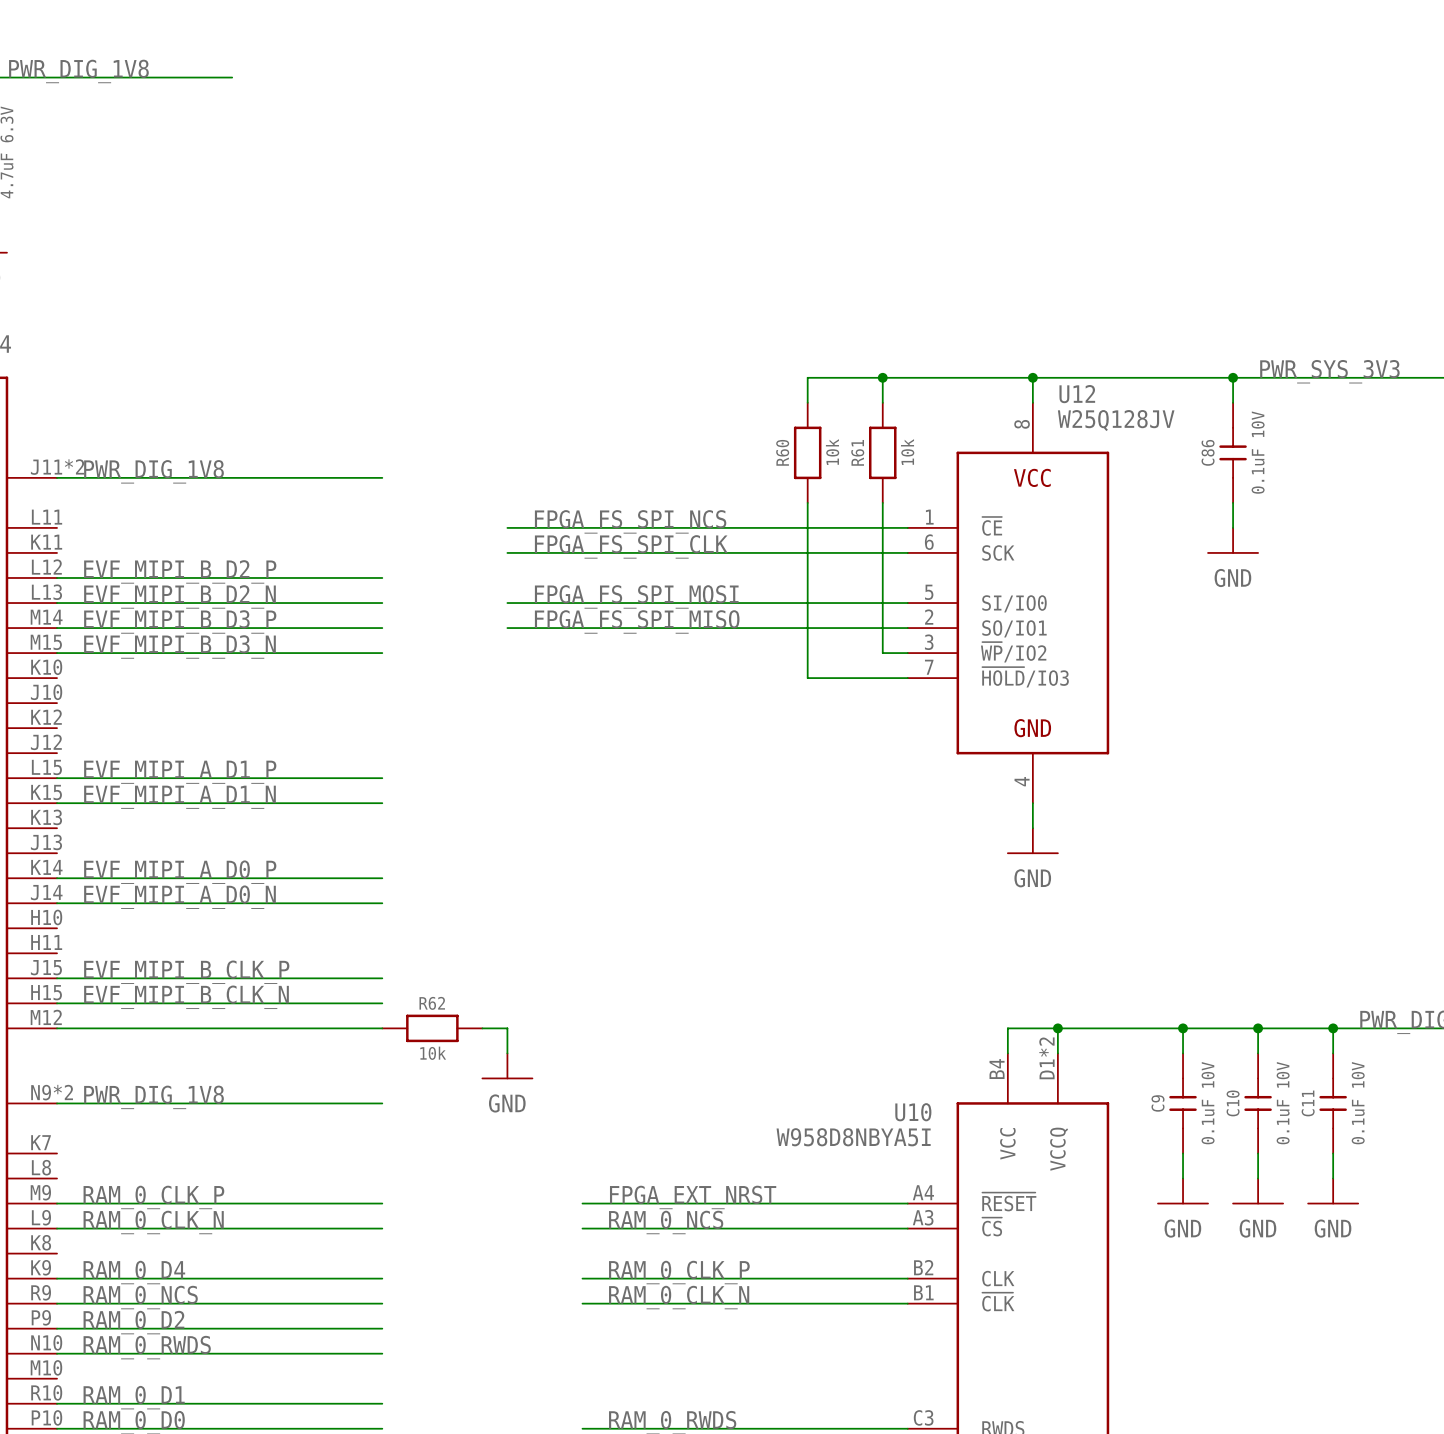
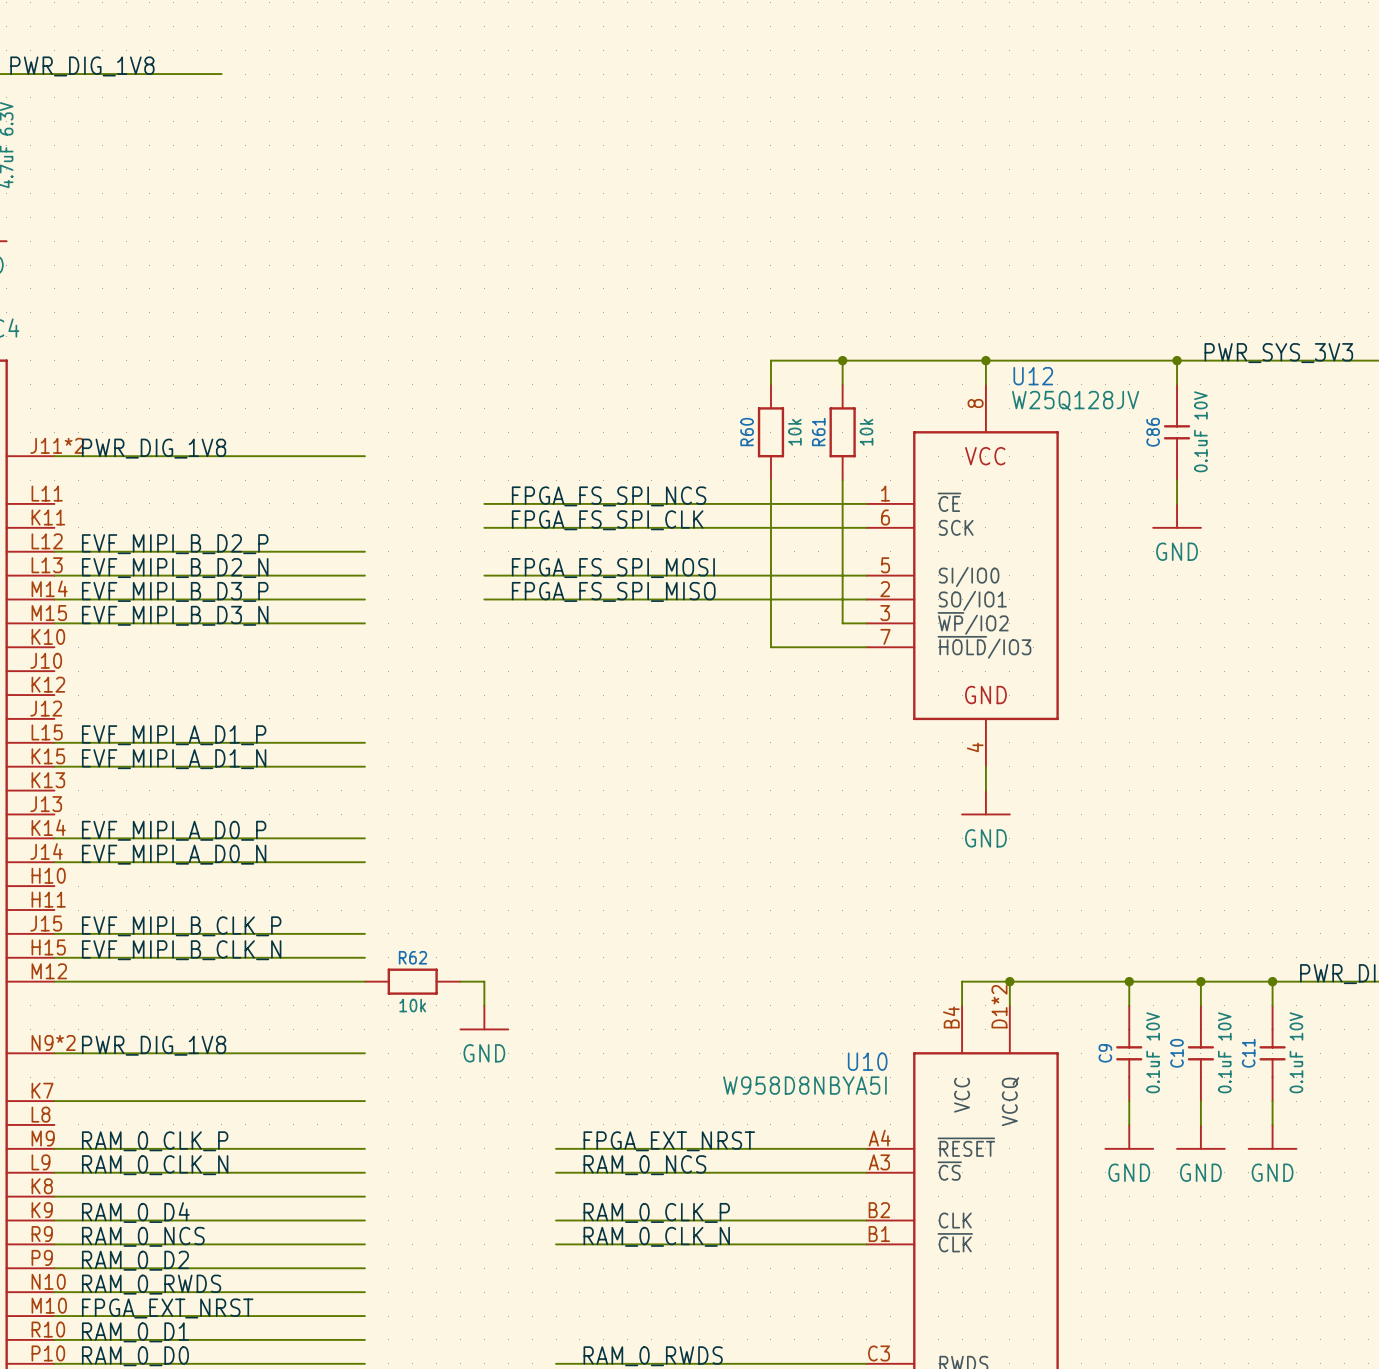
wire: none -> (54, 1101) (364, 1101)
wire: none -> (54, 1196) (364, 1196)
label: none -> FPGA_EXT_NRST (167, 1308)
wire: none -> (54, 1316) (364, 1316)

